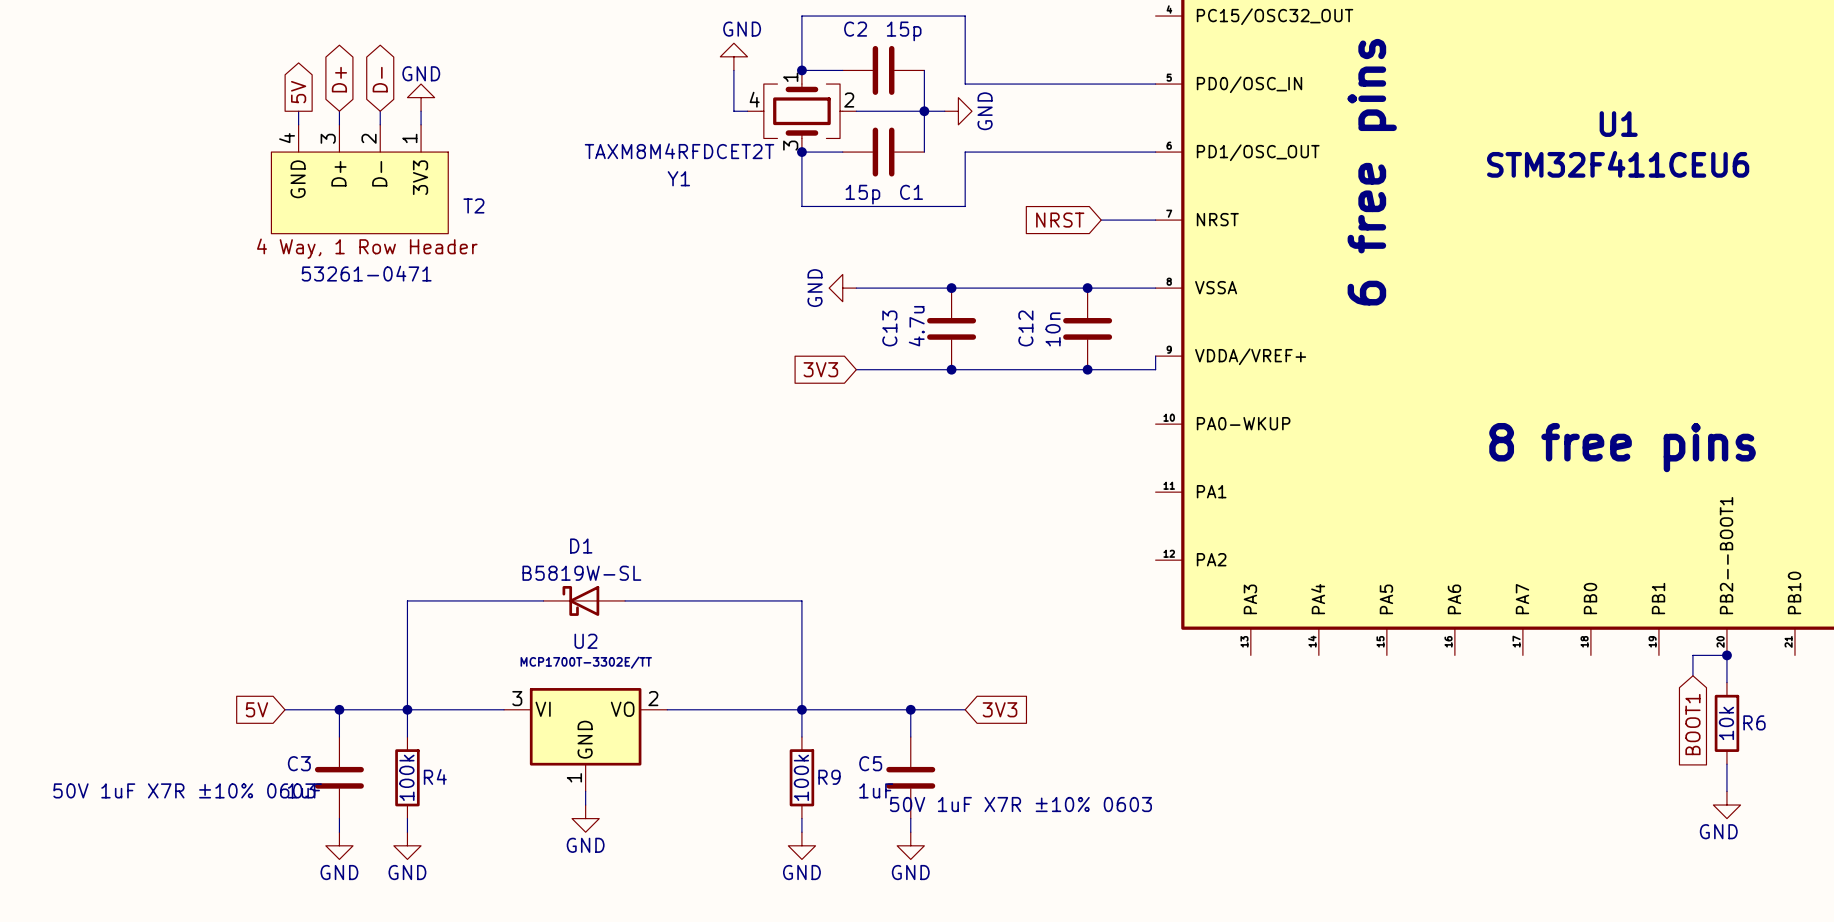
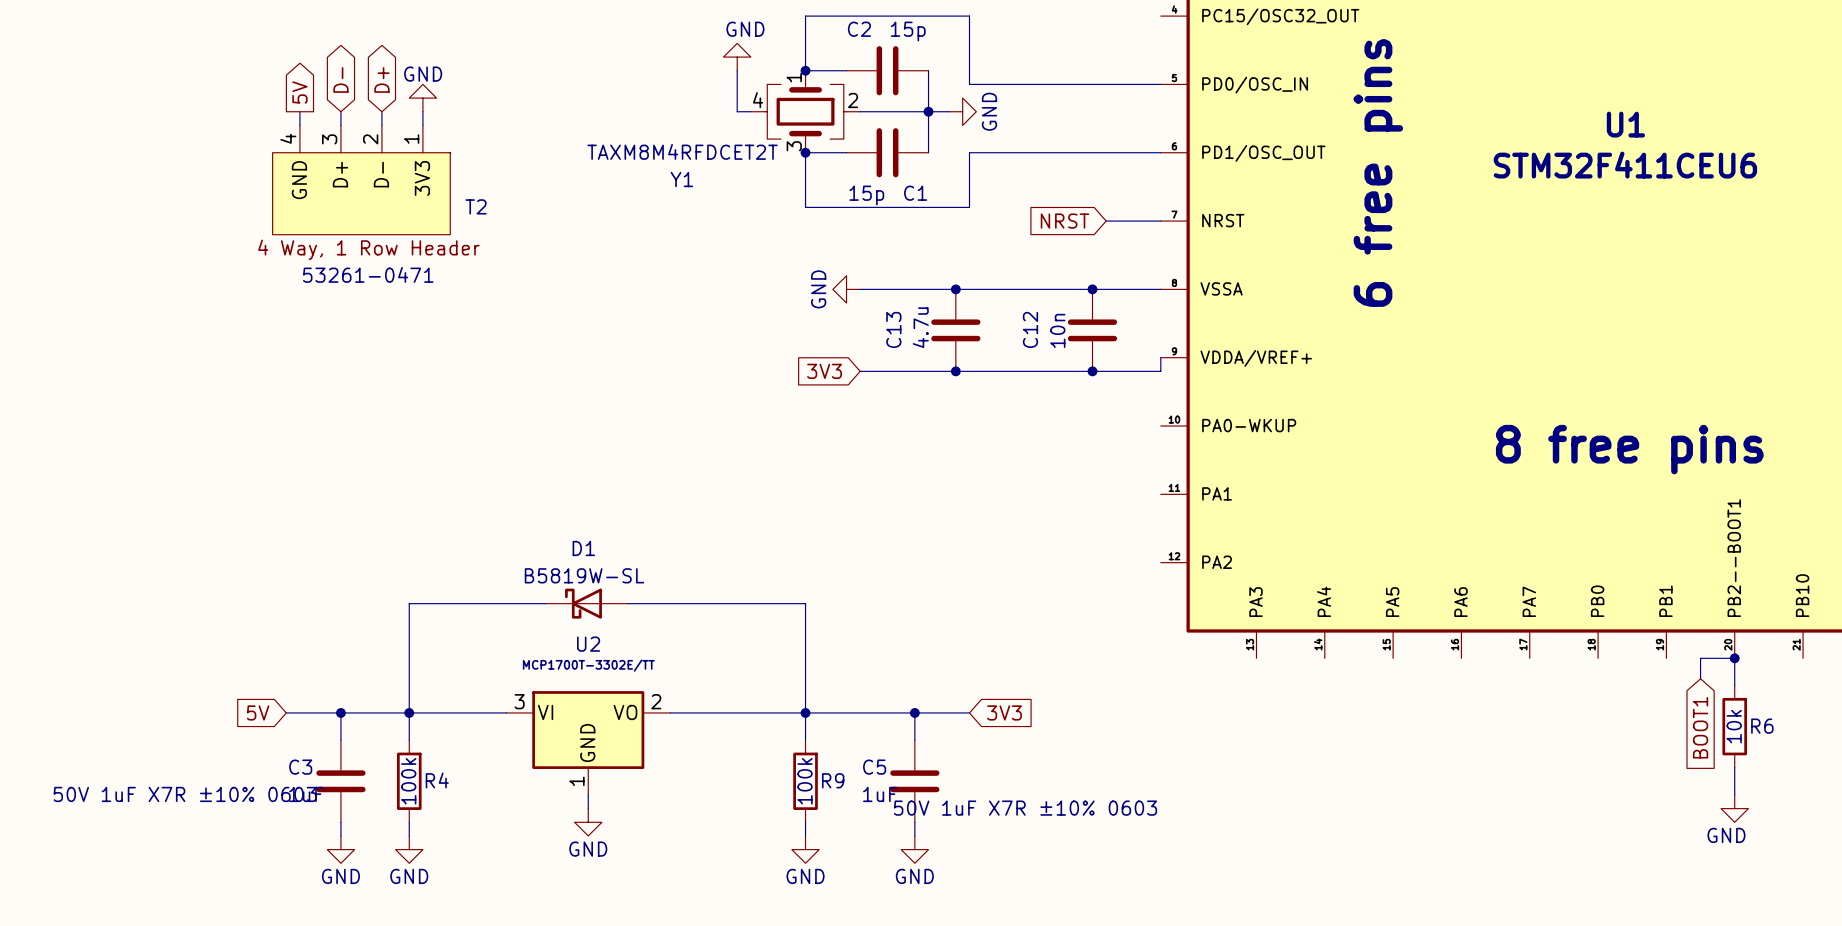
global label: D+ (339, 79) -> D- (340, 80)
global label: D- (380, 79) -> D+ (381, 80)

